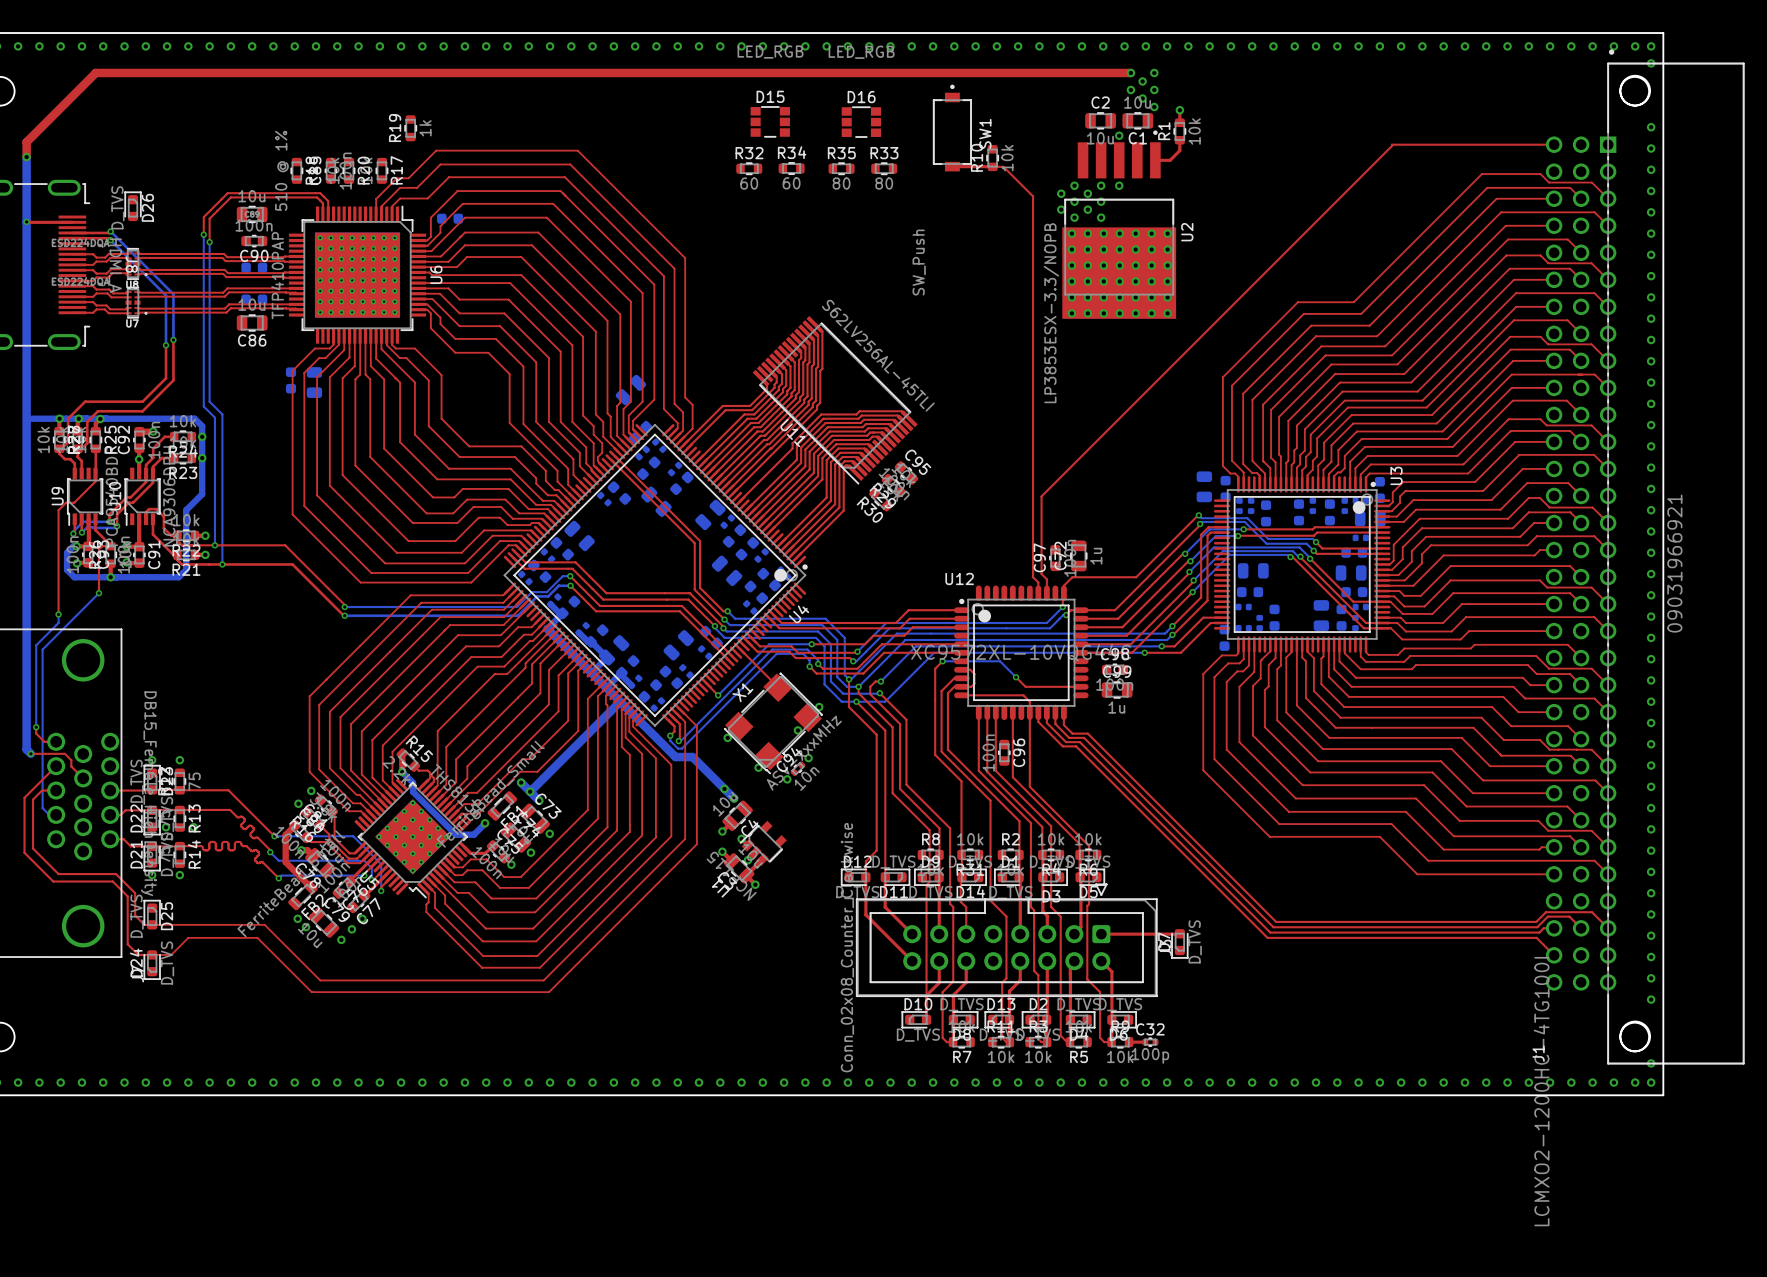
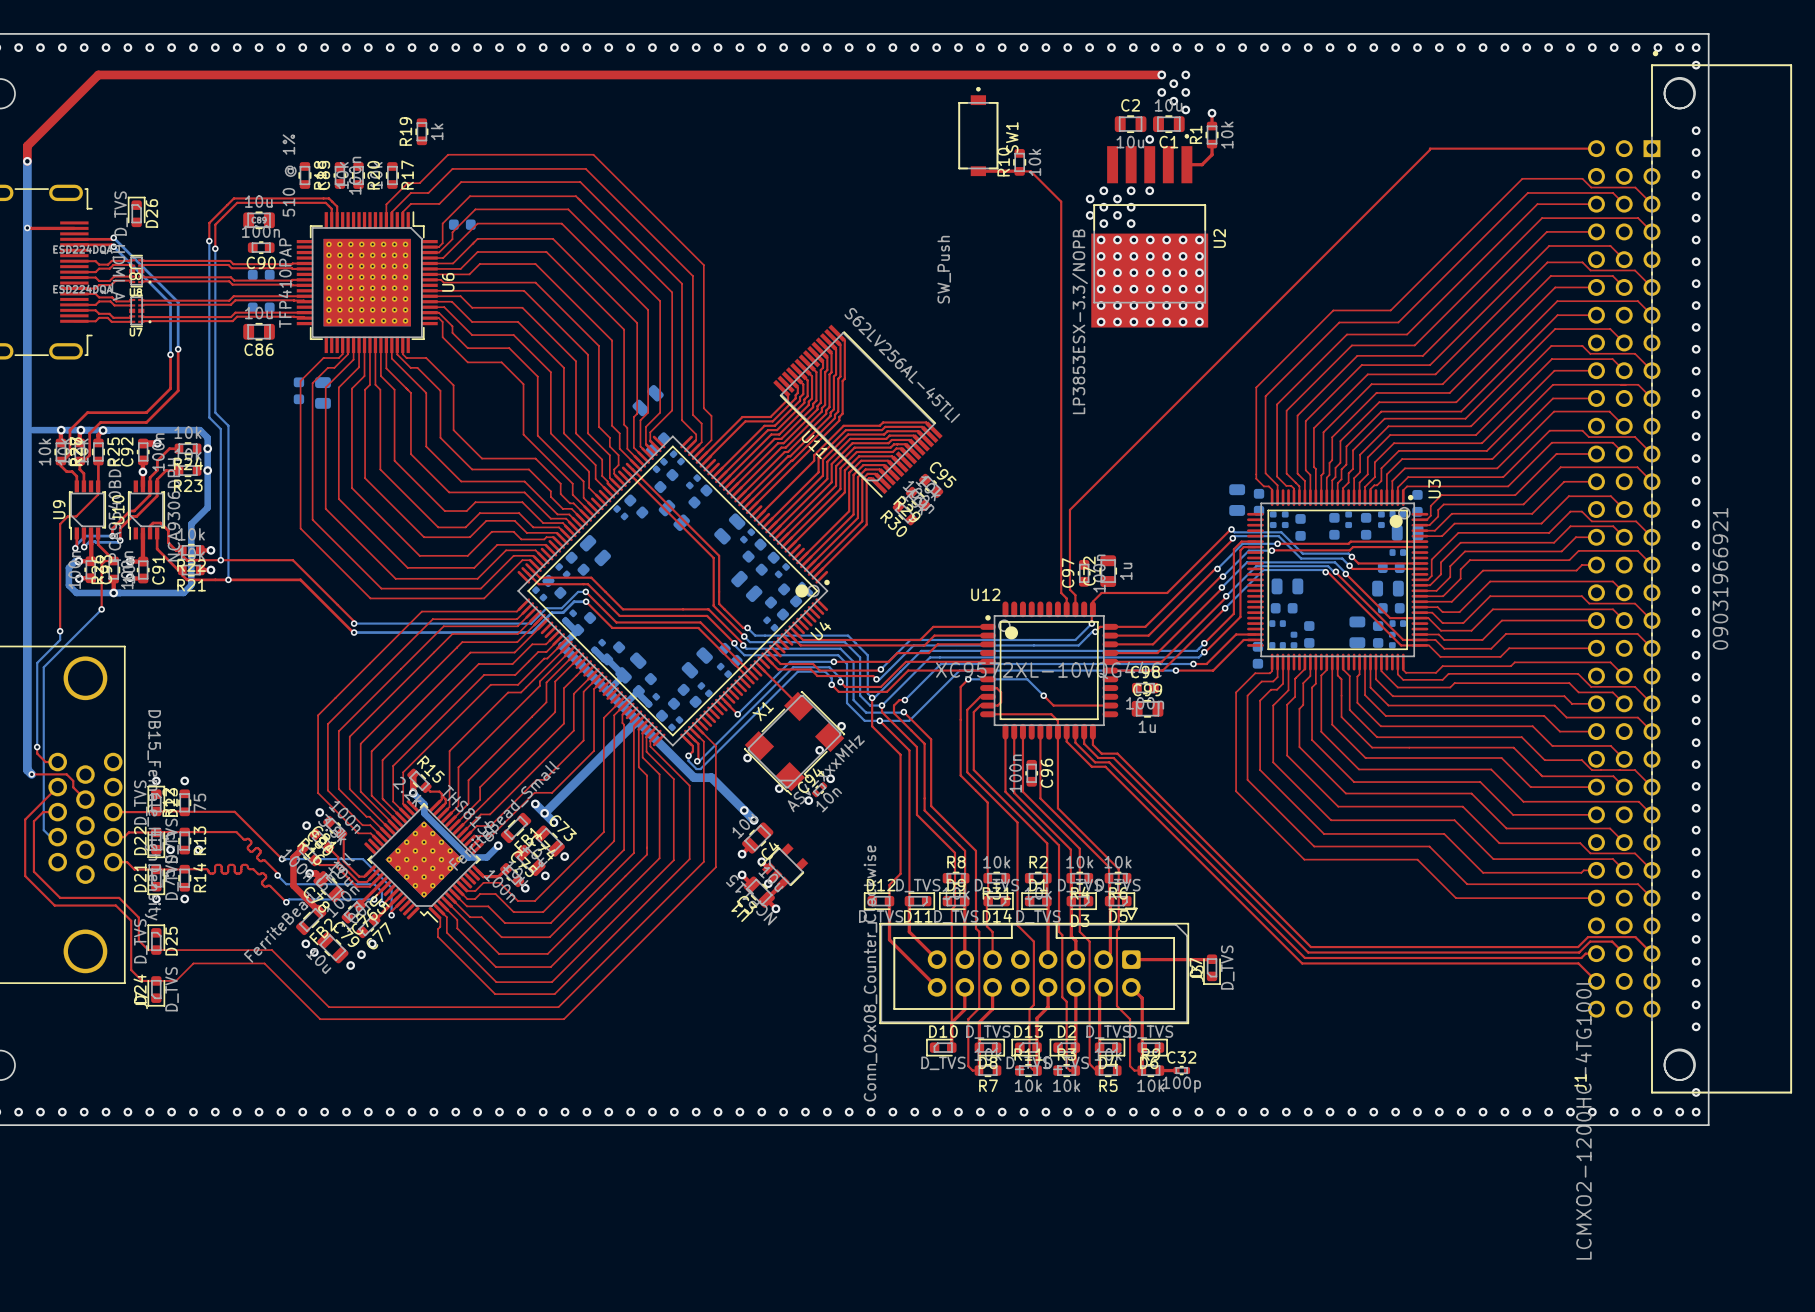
D15: LED_RGB (769, 121) -> none
D16: LED_RGB (860, 121) -> none
R32: 60 (749, 168) -> none
R34: 60 (791, 168) -> none
R35: 80 (841, 168) -> none
R33: 80 (884, 168) -> none

